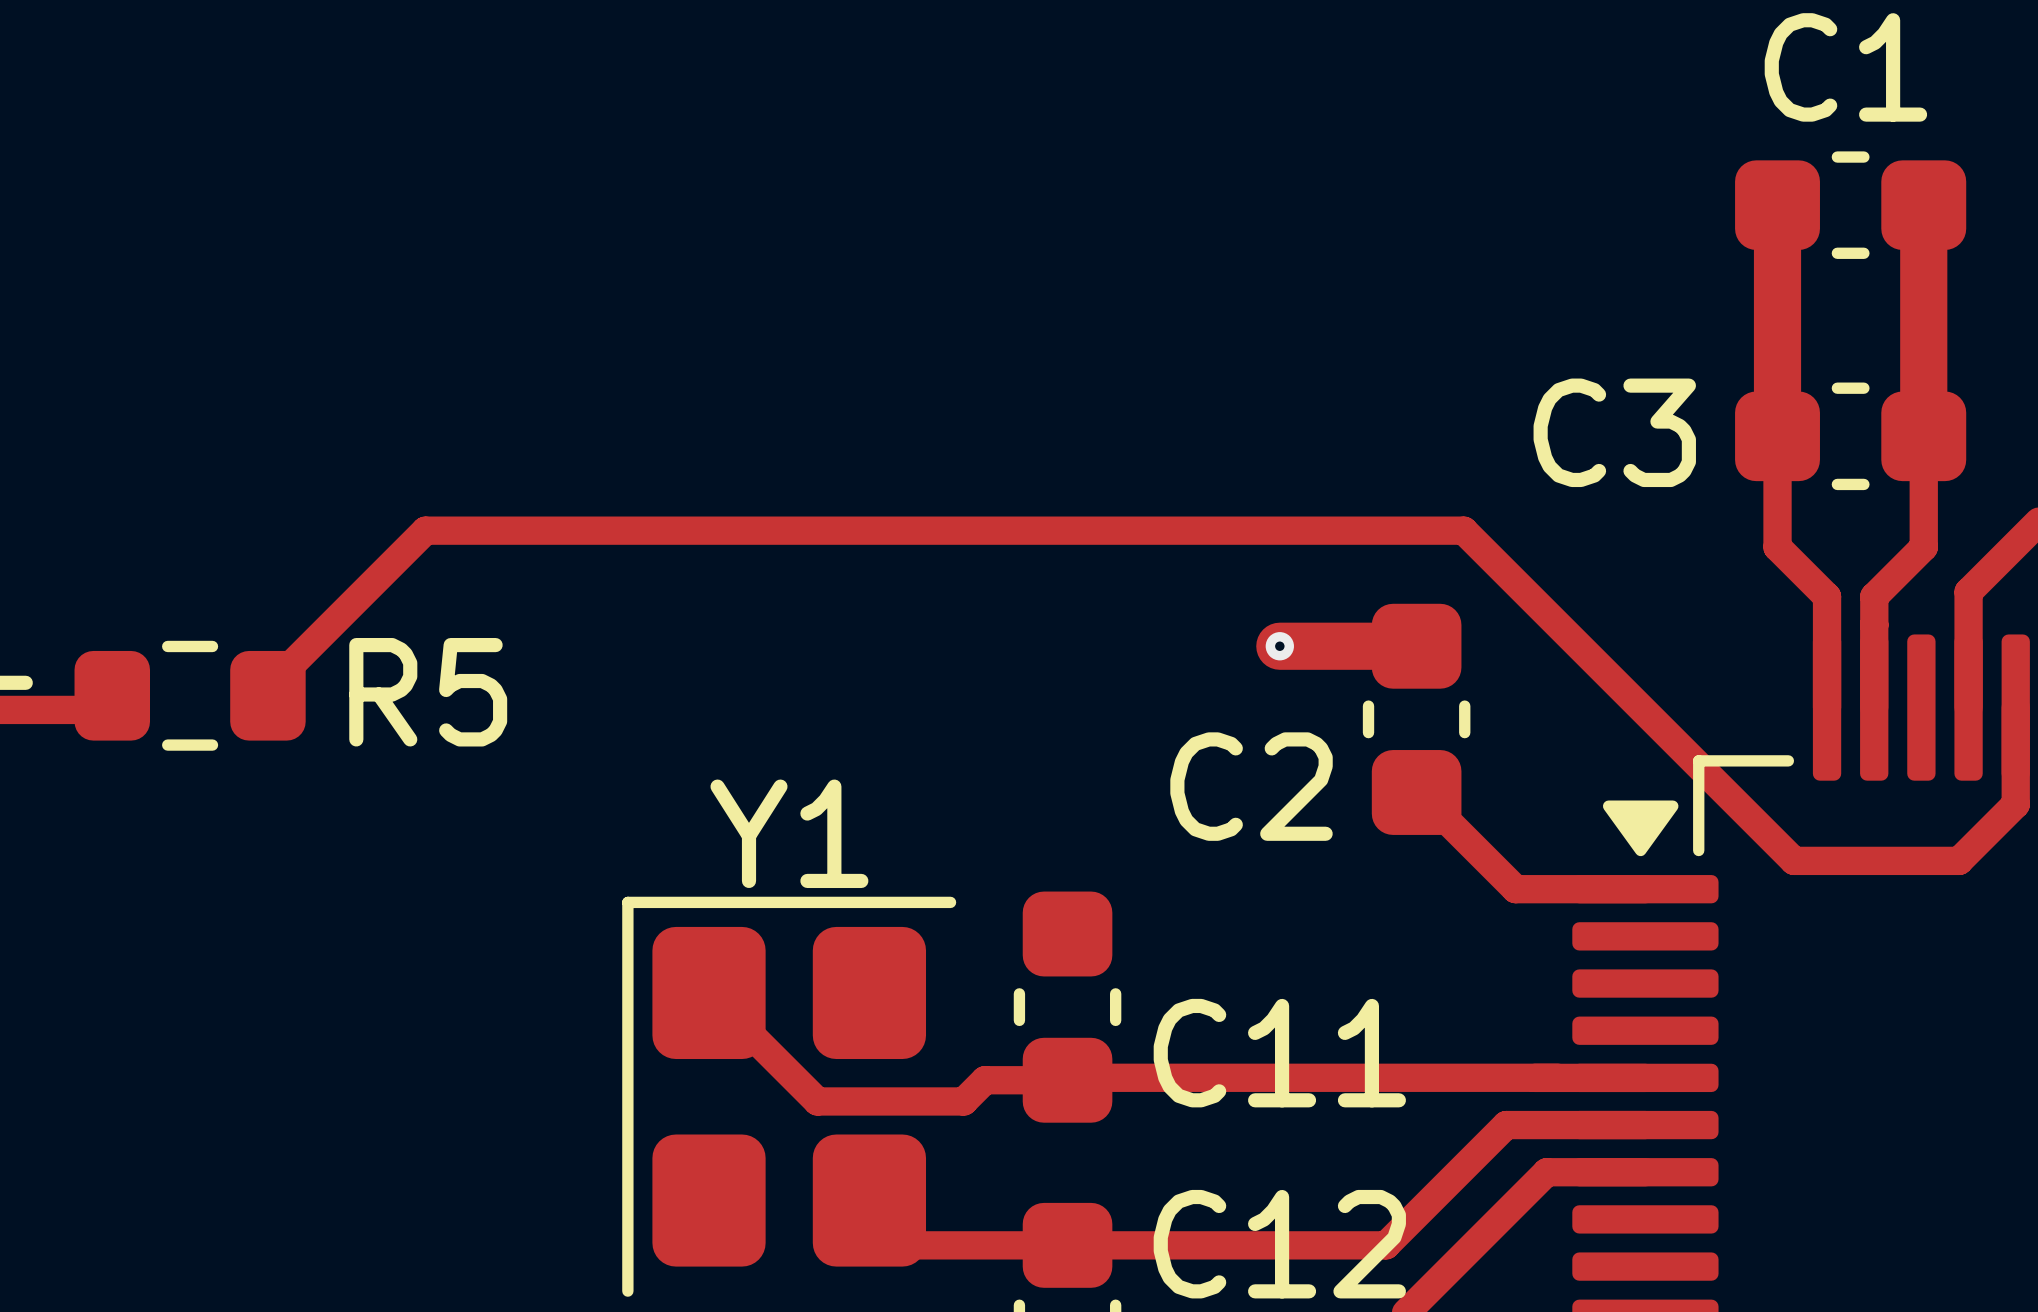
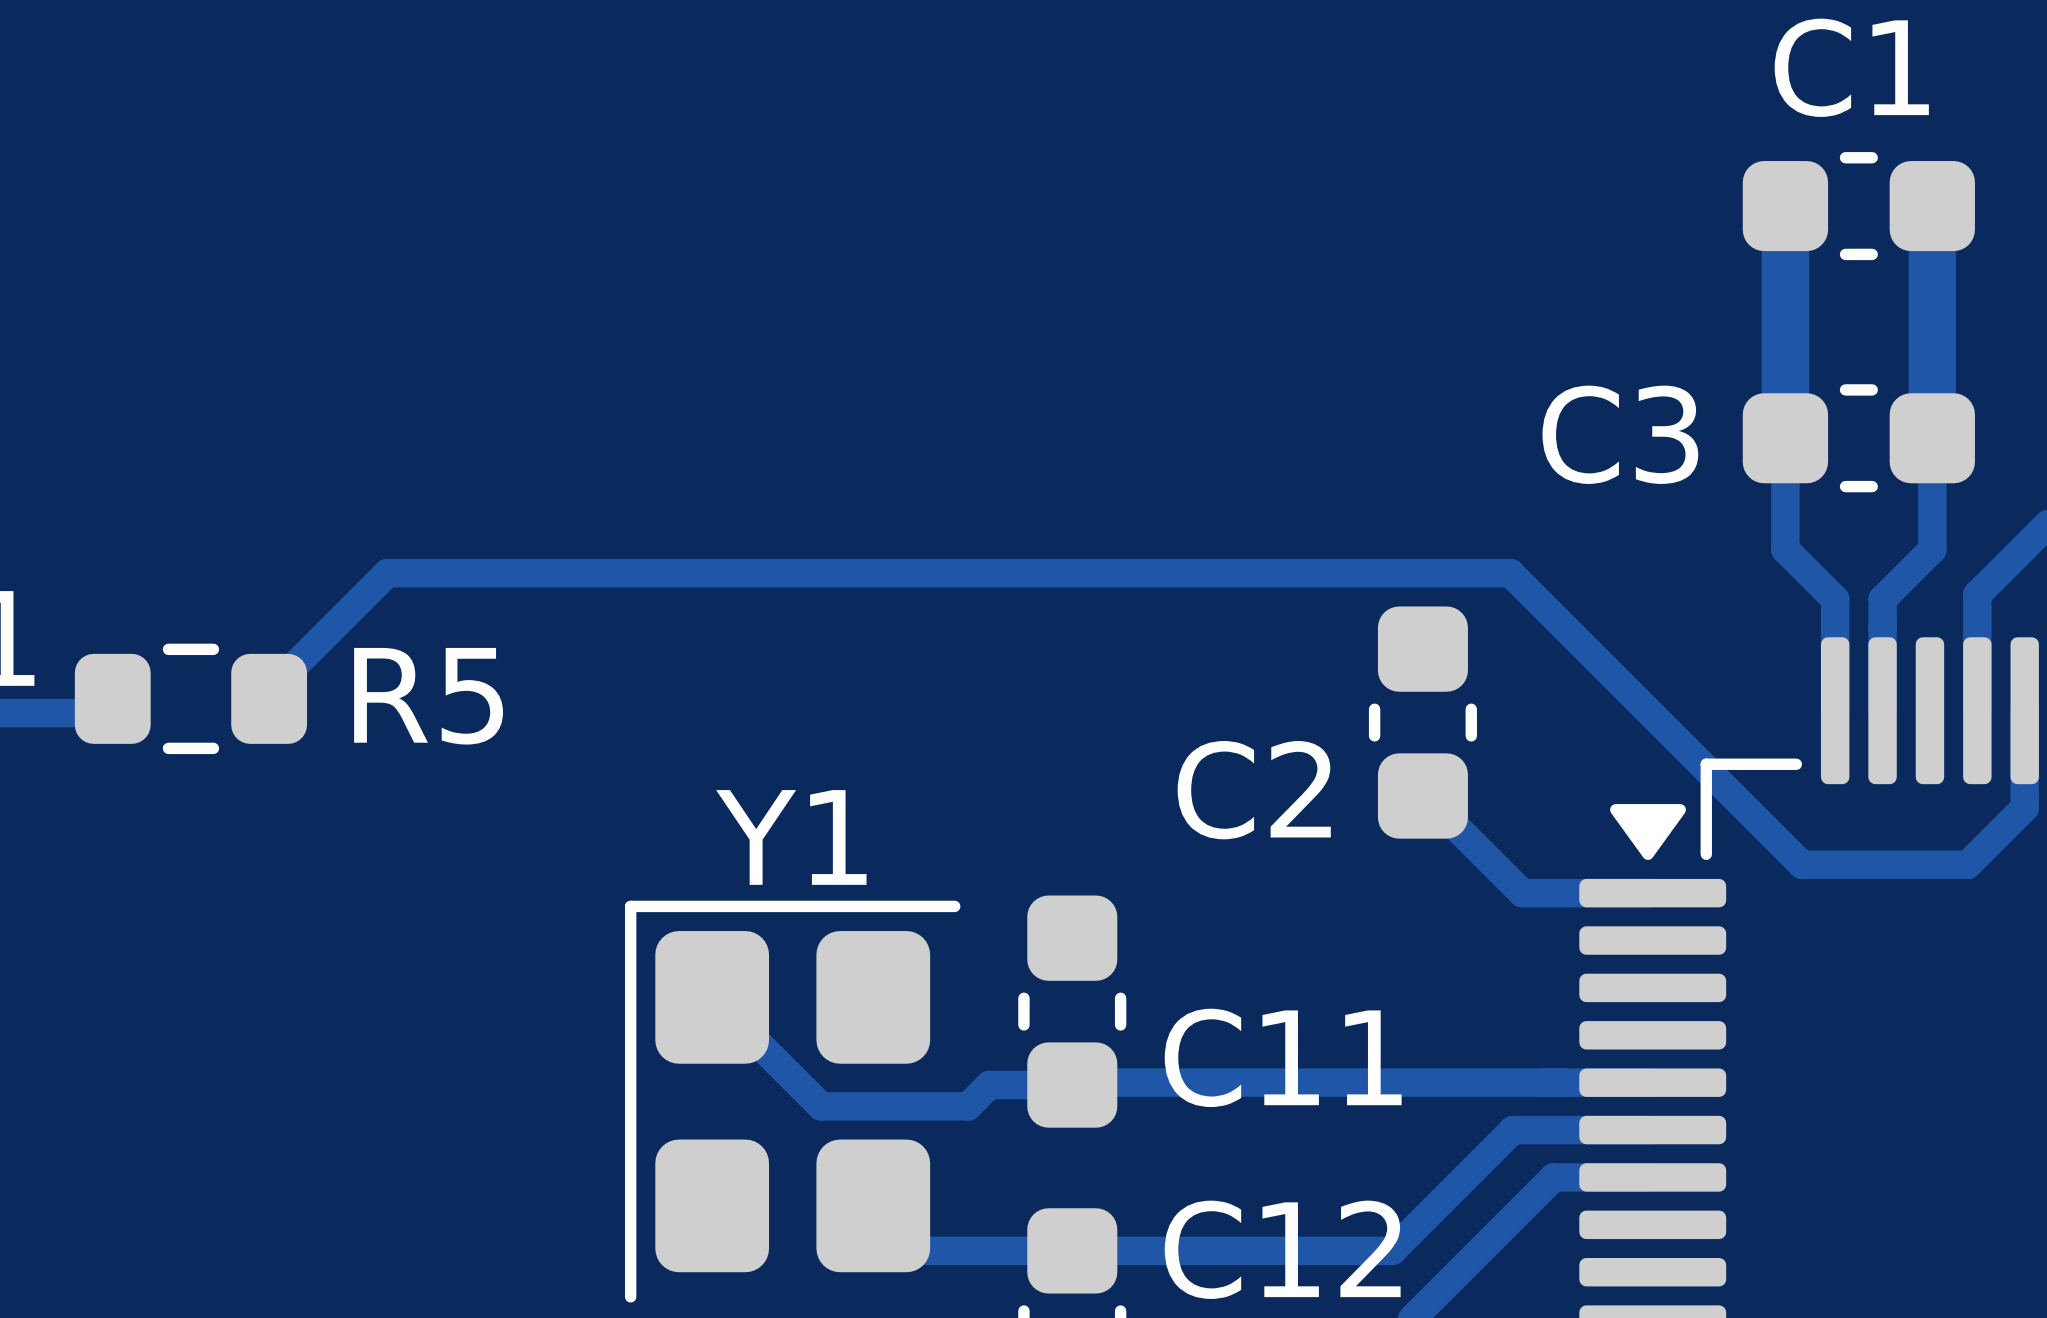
track: (385, 570) (425, 530) (1463, 530) (1503, 570) -> (387, 573) (1510, 573)
track: (1279, 646) (1416, 646) -> none
via: (1279, 646) -> none

